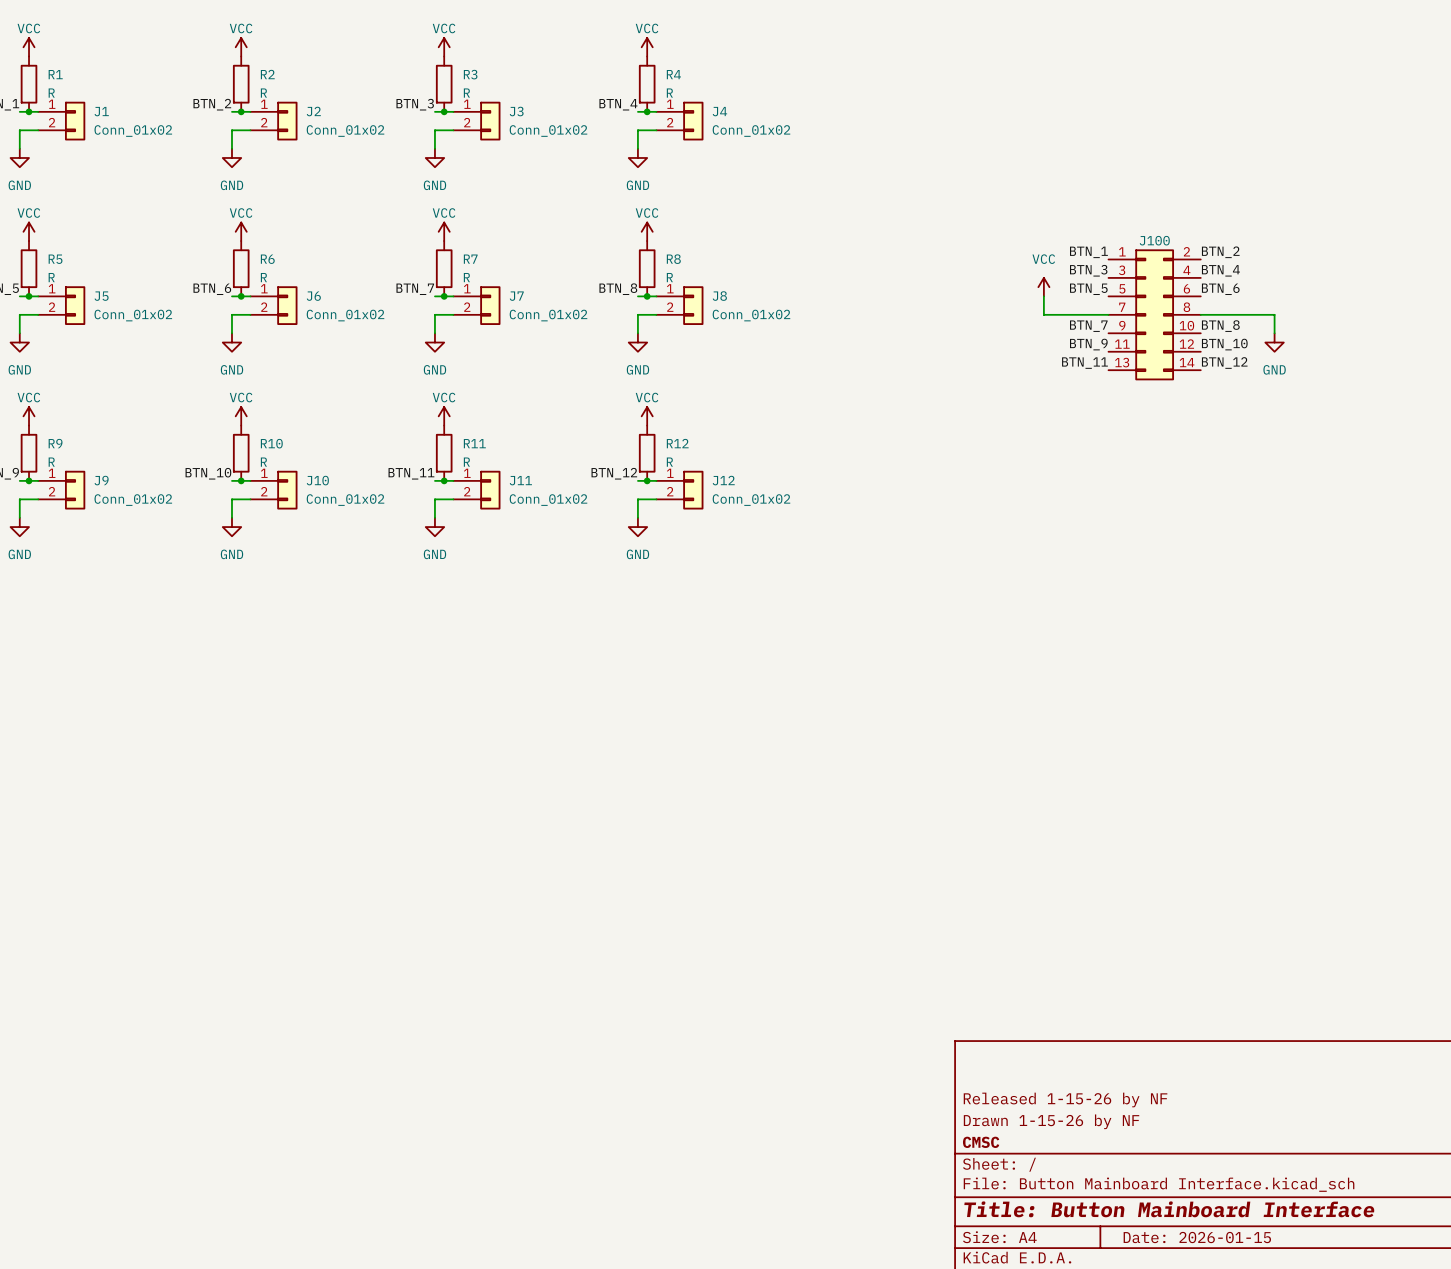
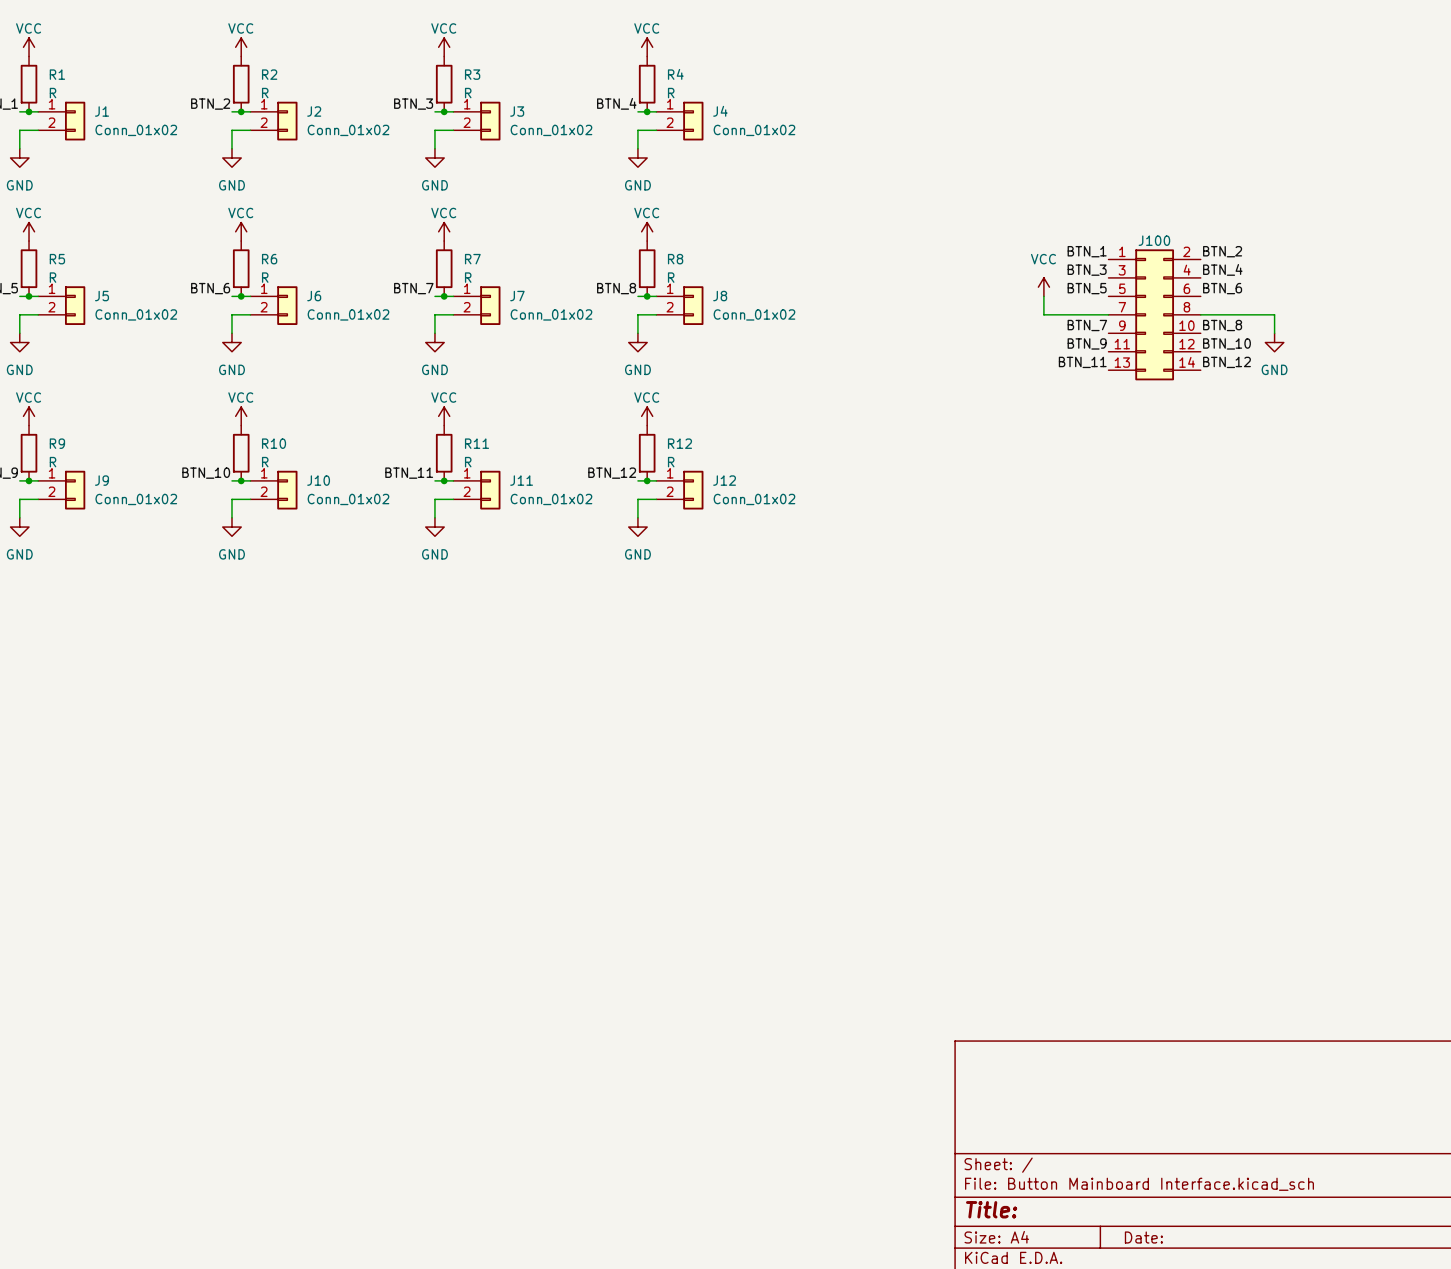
title block: Released 1-15-26 by NF (1065, 1099) -> none
title block: Drawn 1-15-26 by NF (1051, 1121) -> none
title block: CMSC (981, 1142) -> none
title block: Title: Button Mainboard Interface (1169, 1209) -> Title: (991, 1209)
title block: Date: 2026-01-15 (1197, 1237) -> Date: (1143, 1237)

